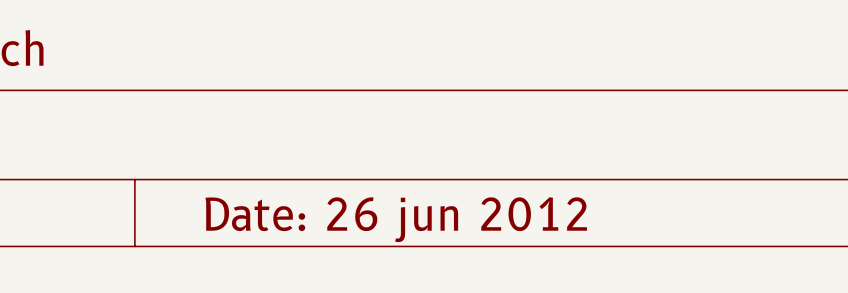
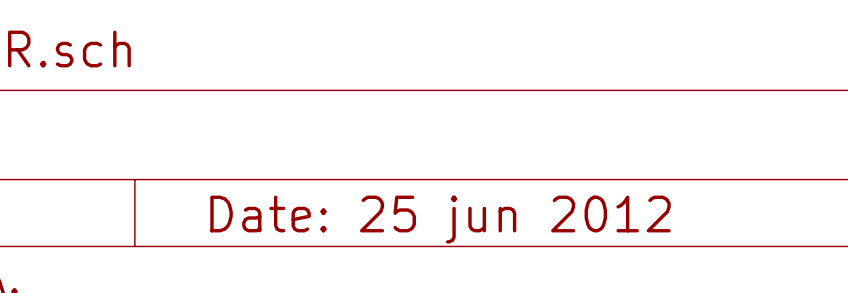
title block: Date: 26 jun 2012 (396, 219) -> Date: 25 jun 2012 (440, 219)

